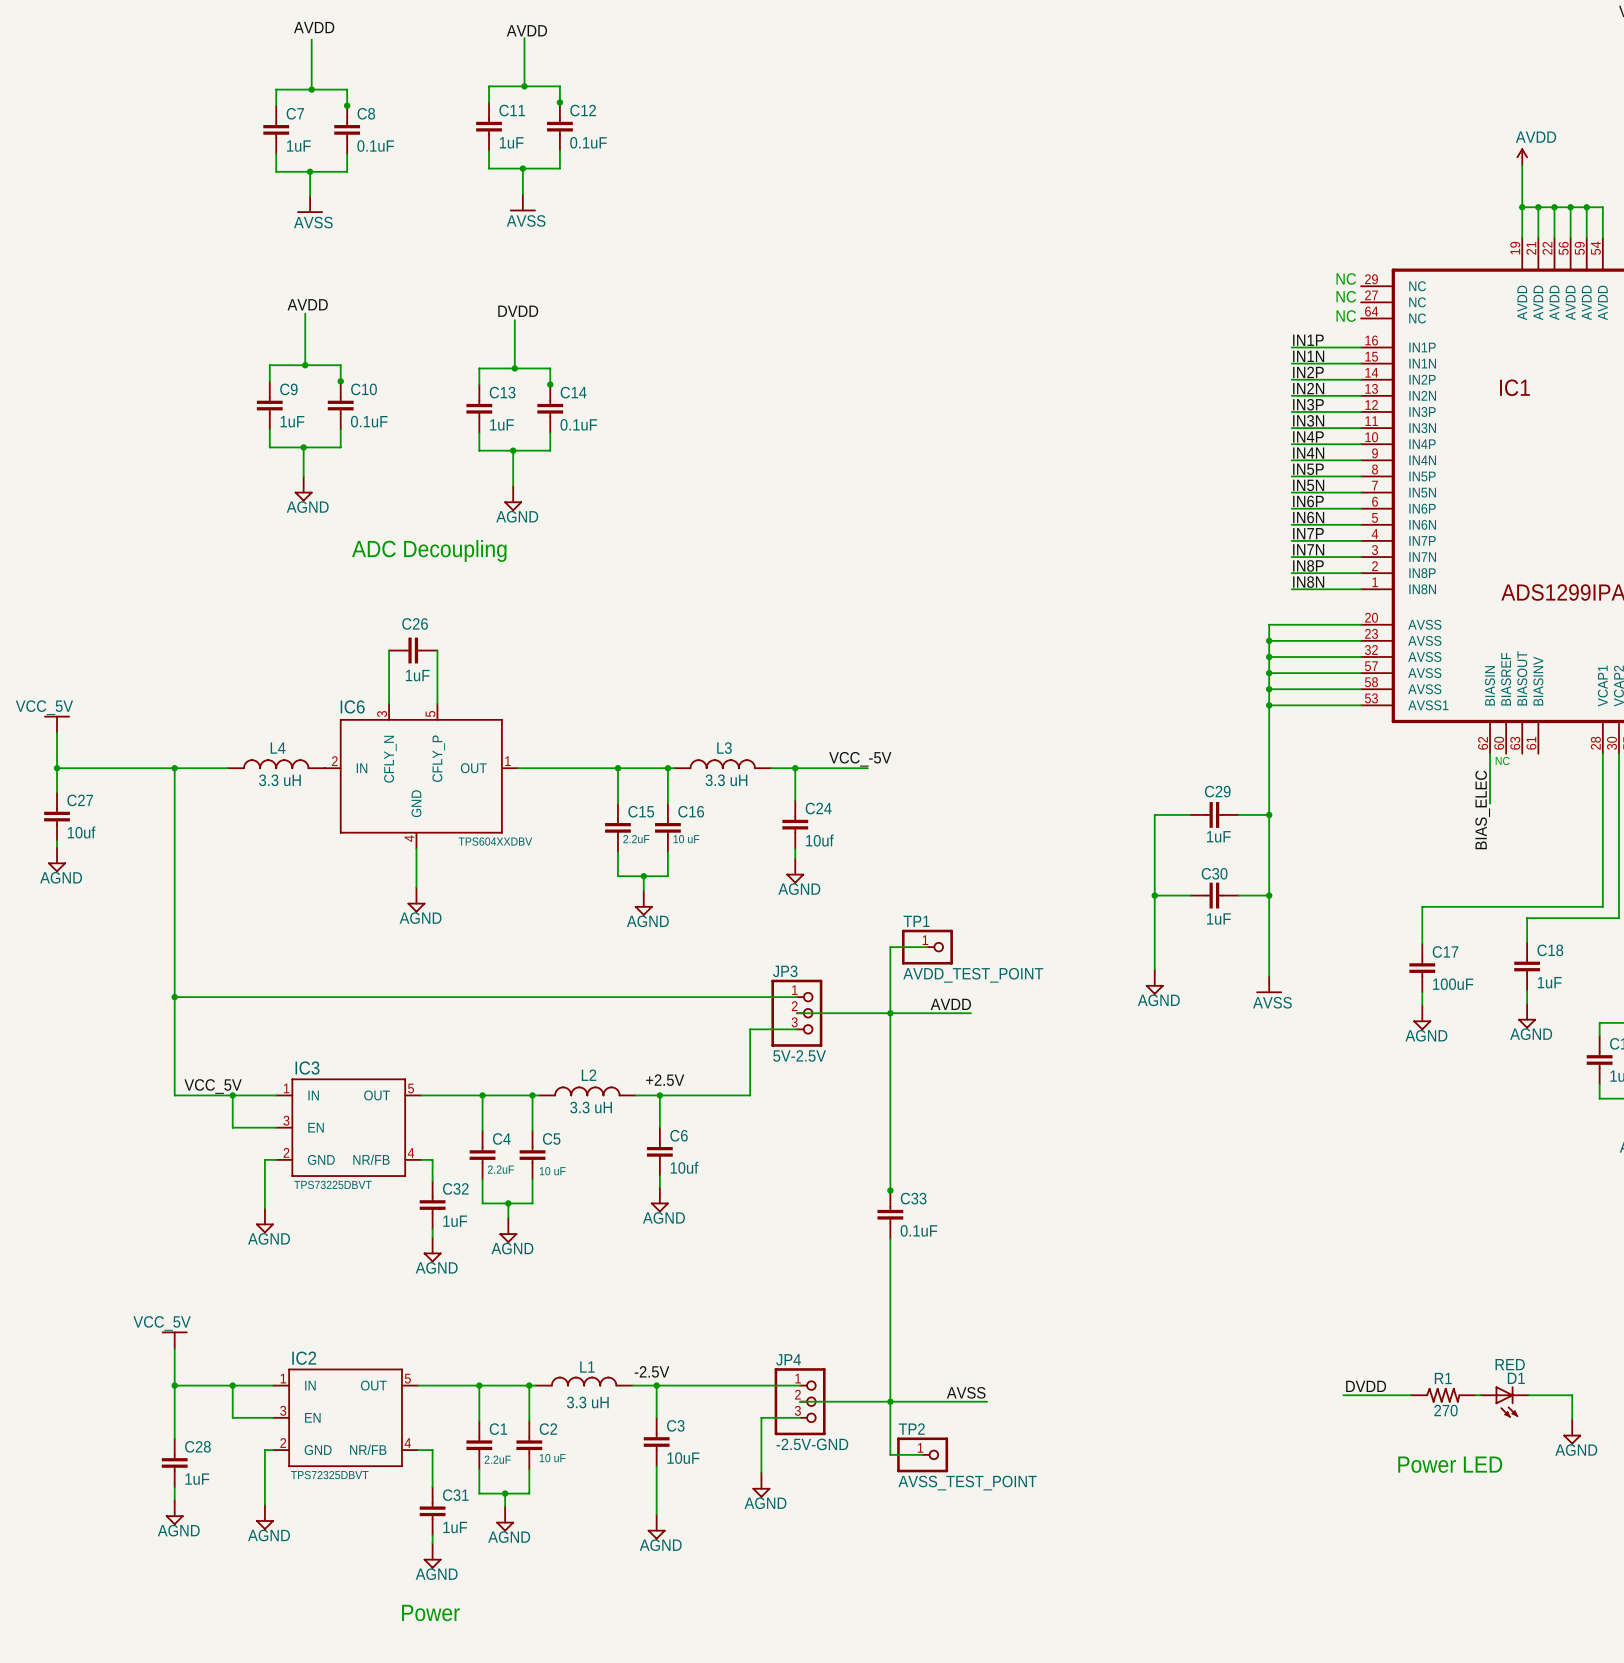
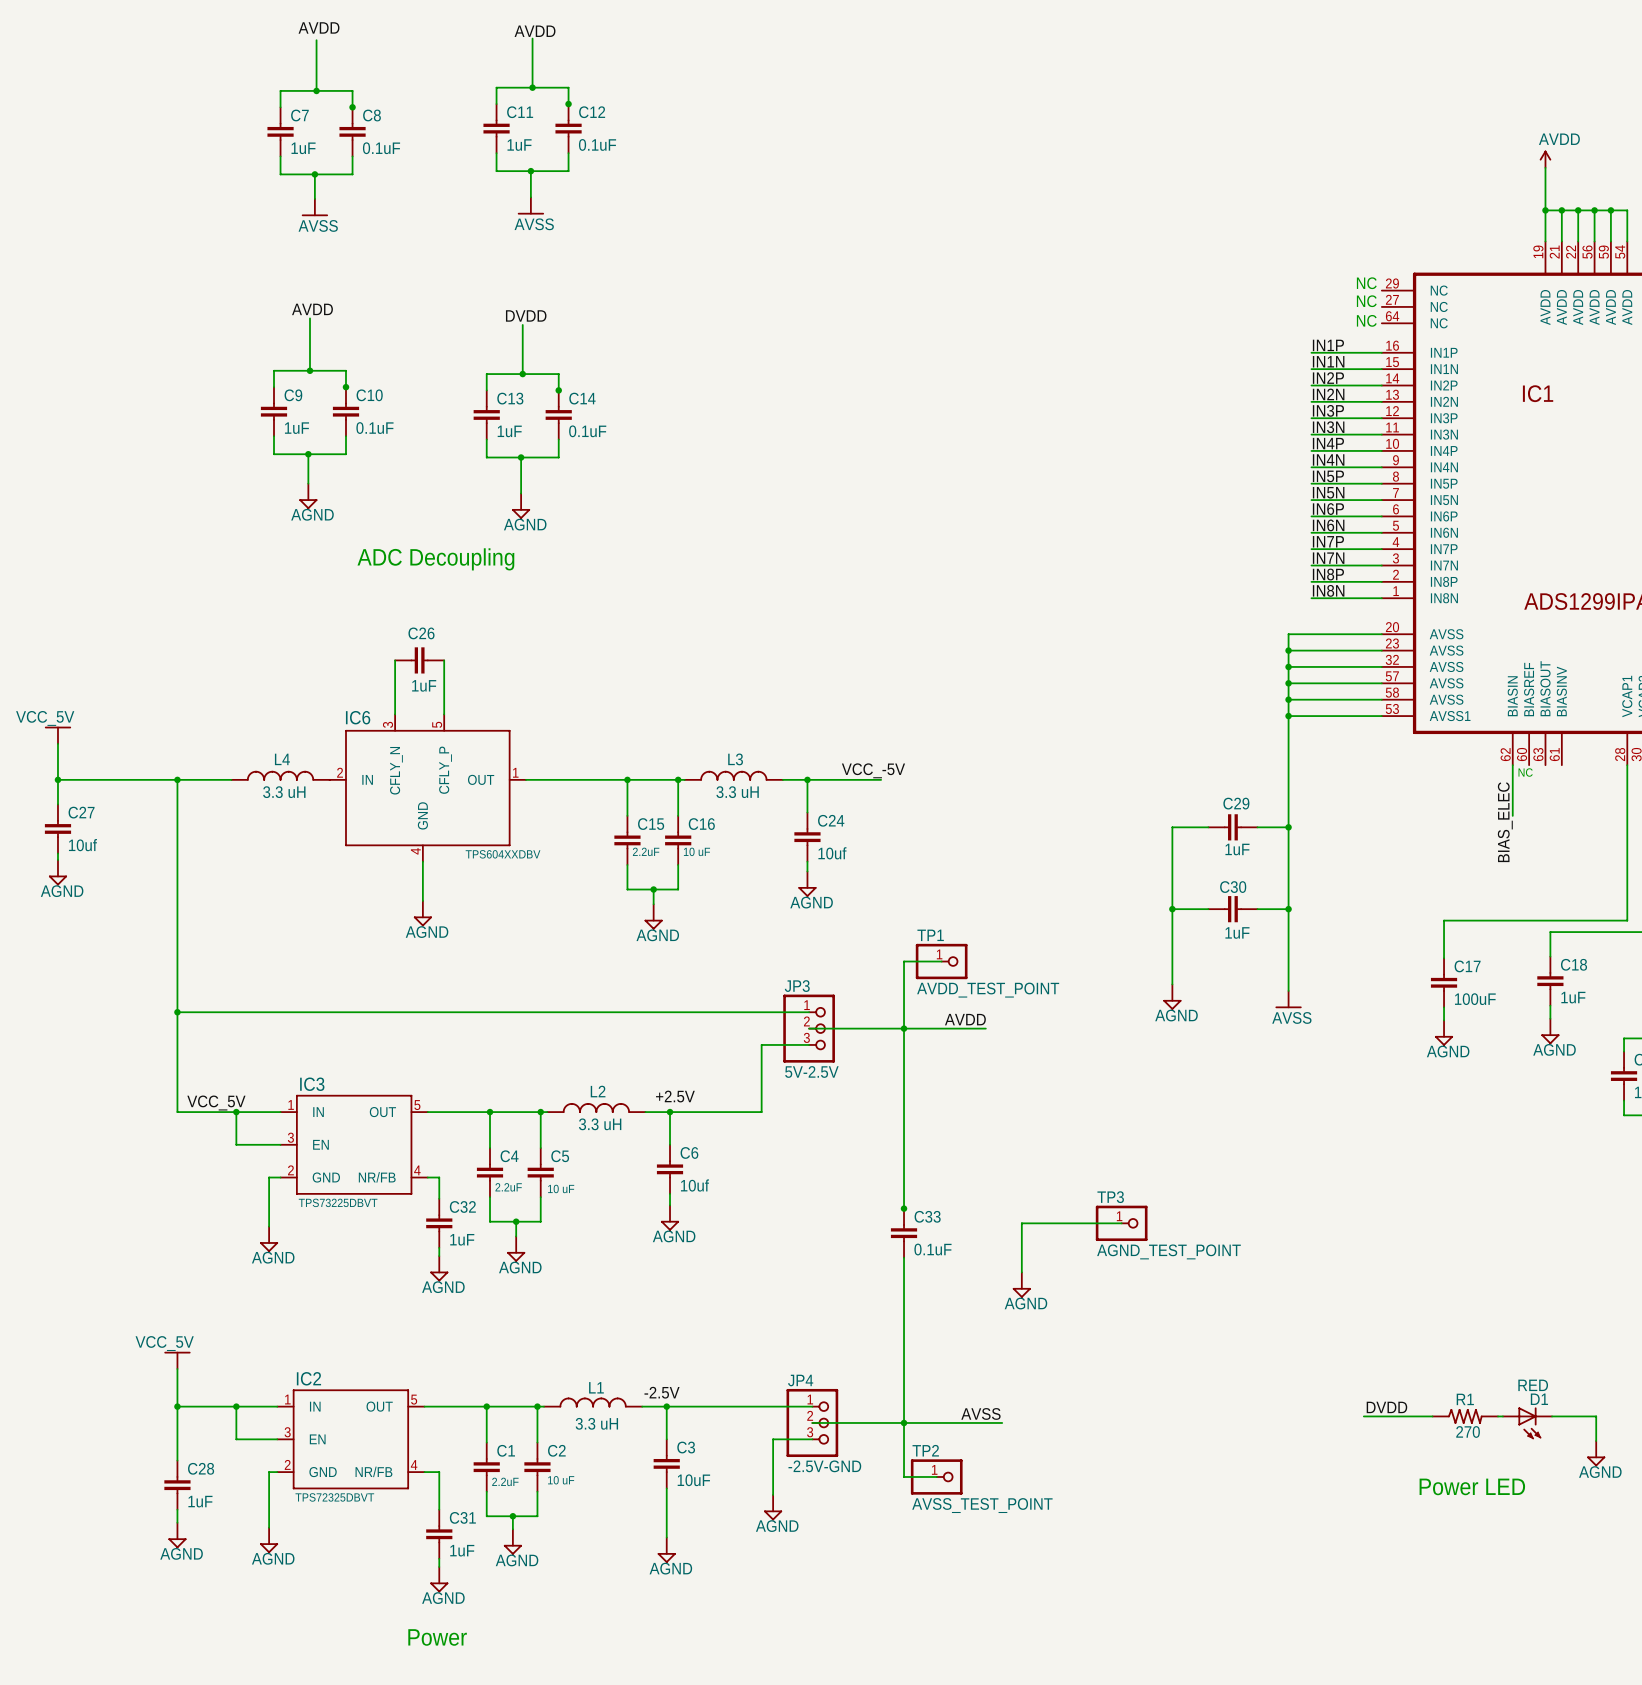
wire: none -> (1121, 1223) (1021, 1223) (1021, 1272)
TP3: none -> AGND_TEST_POINT (1121, 1223)
power symbol: none -> AGND (1021, 1285)

